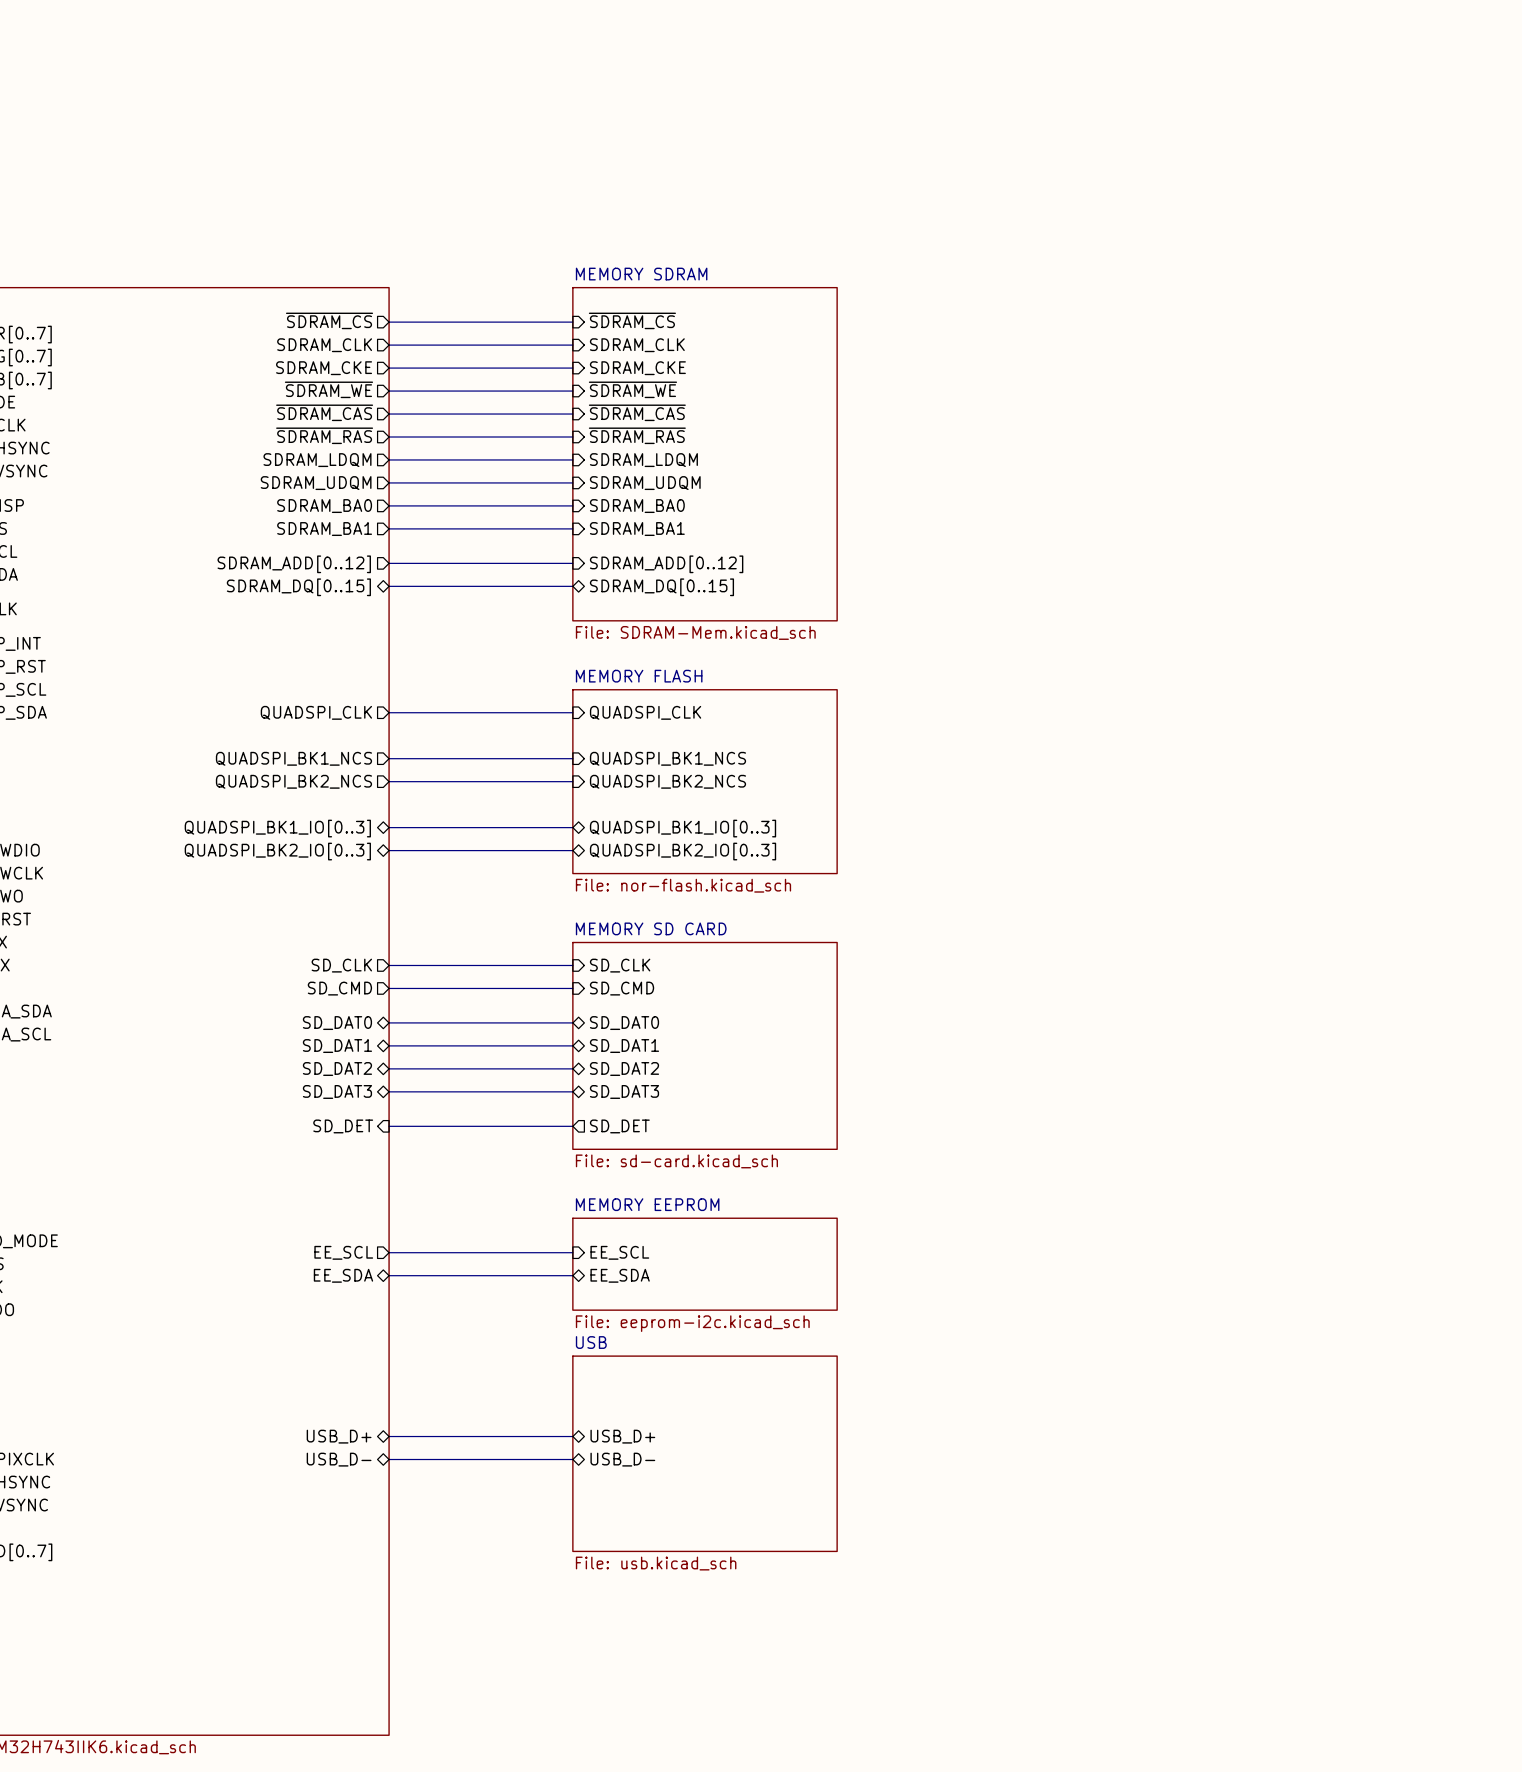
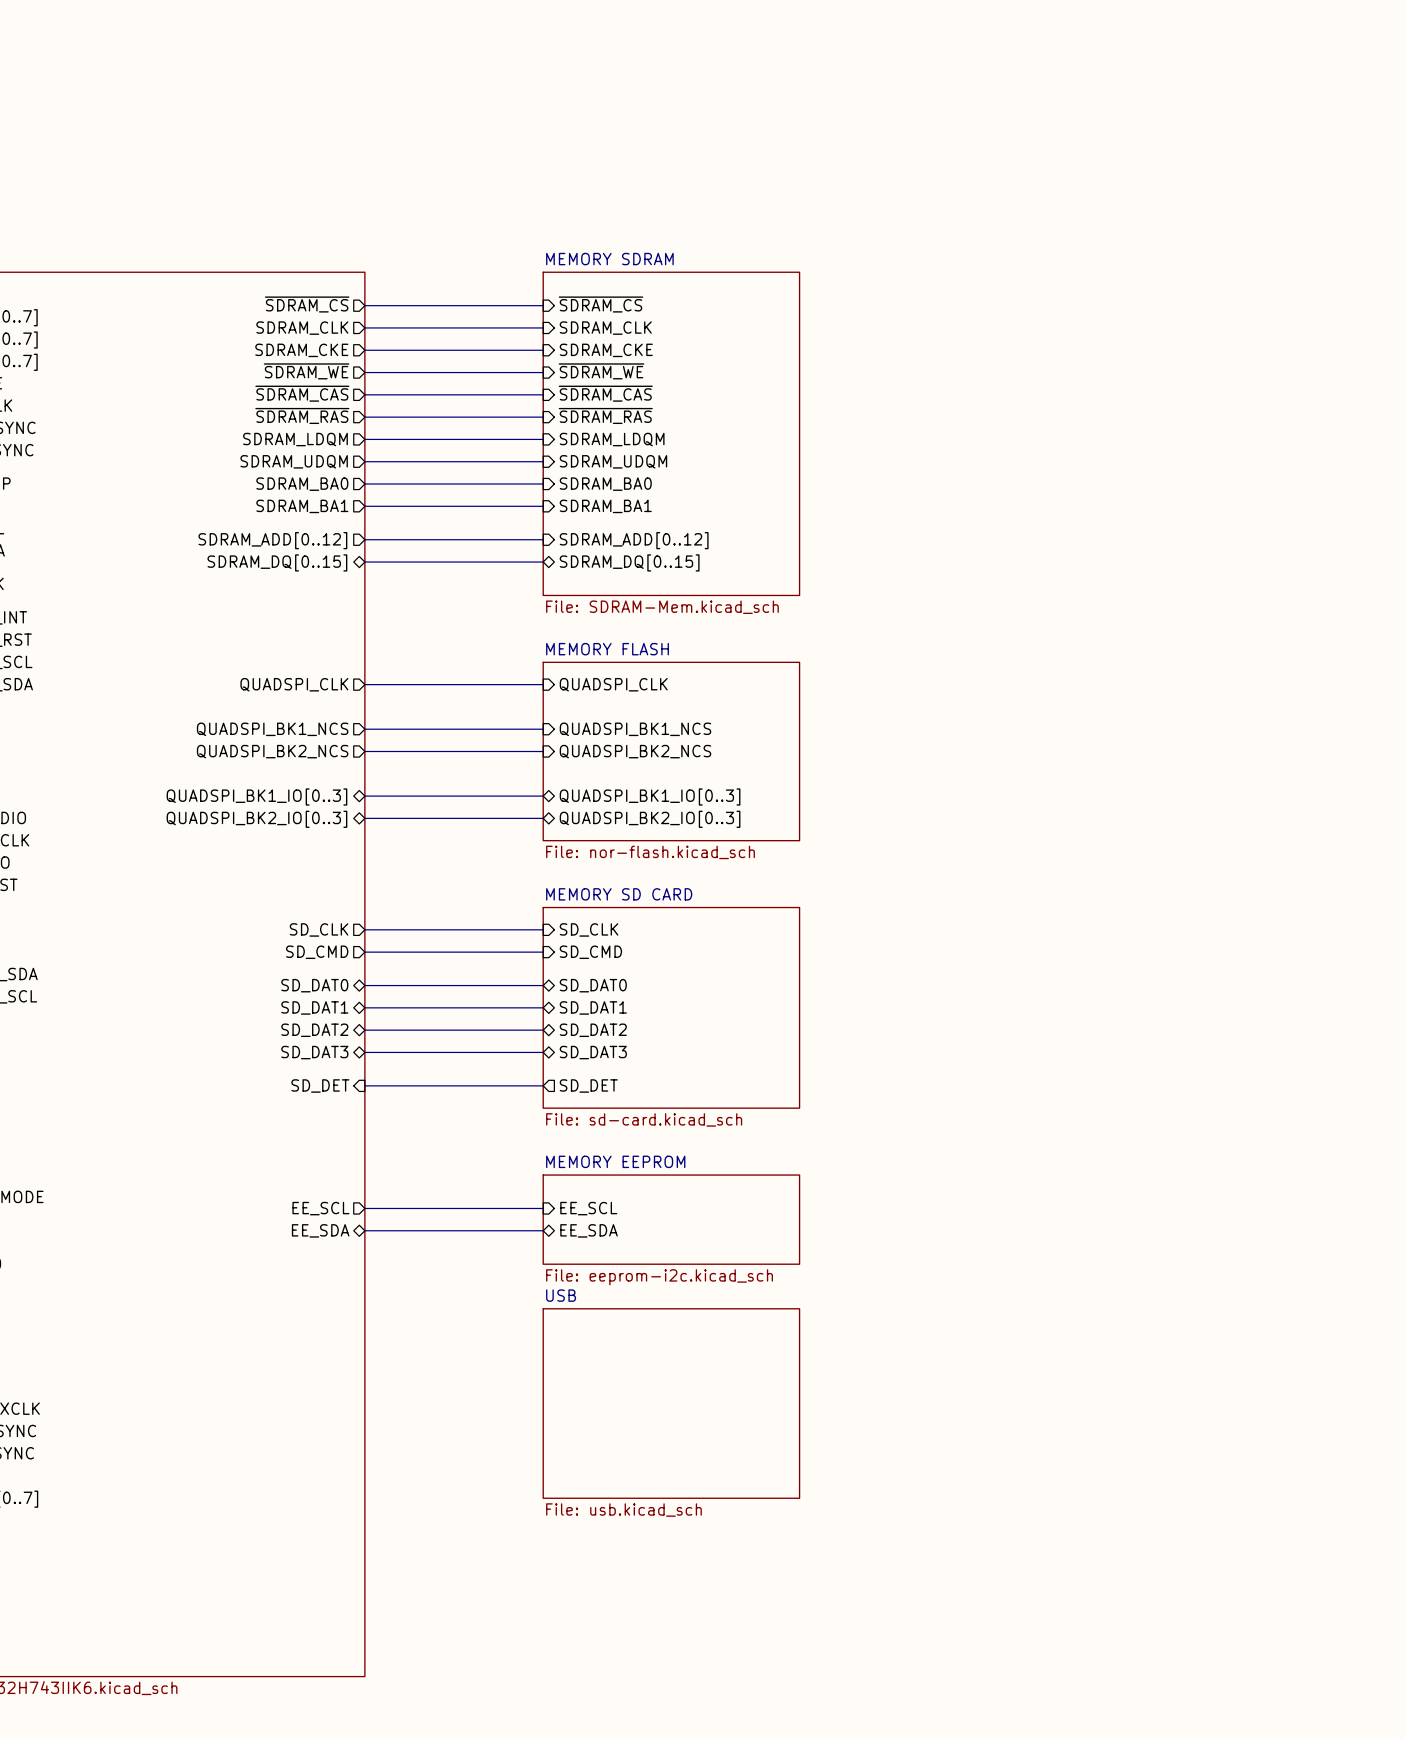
sheet pin: USB_D+ (339, 1436) -> none
wire: (389, 1436) (572, 1436) -> none
sheet pin: USB_D+ (622, 1436) -> none
sheet pin: USB_D- (339, 1459) -> none
wire: (389, 1459) (572, 1459) -> none
sheet pin: USB_D- (622, 1459) -> none

